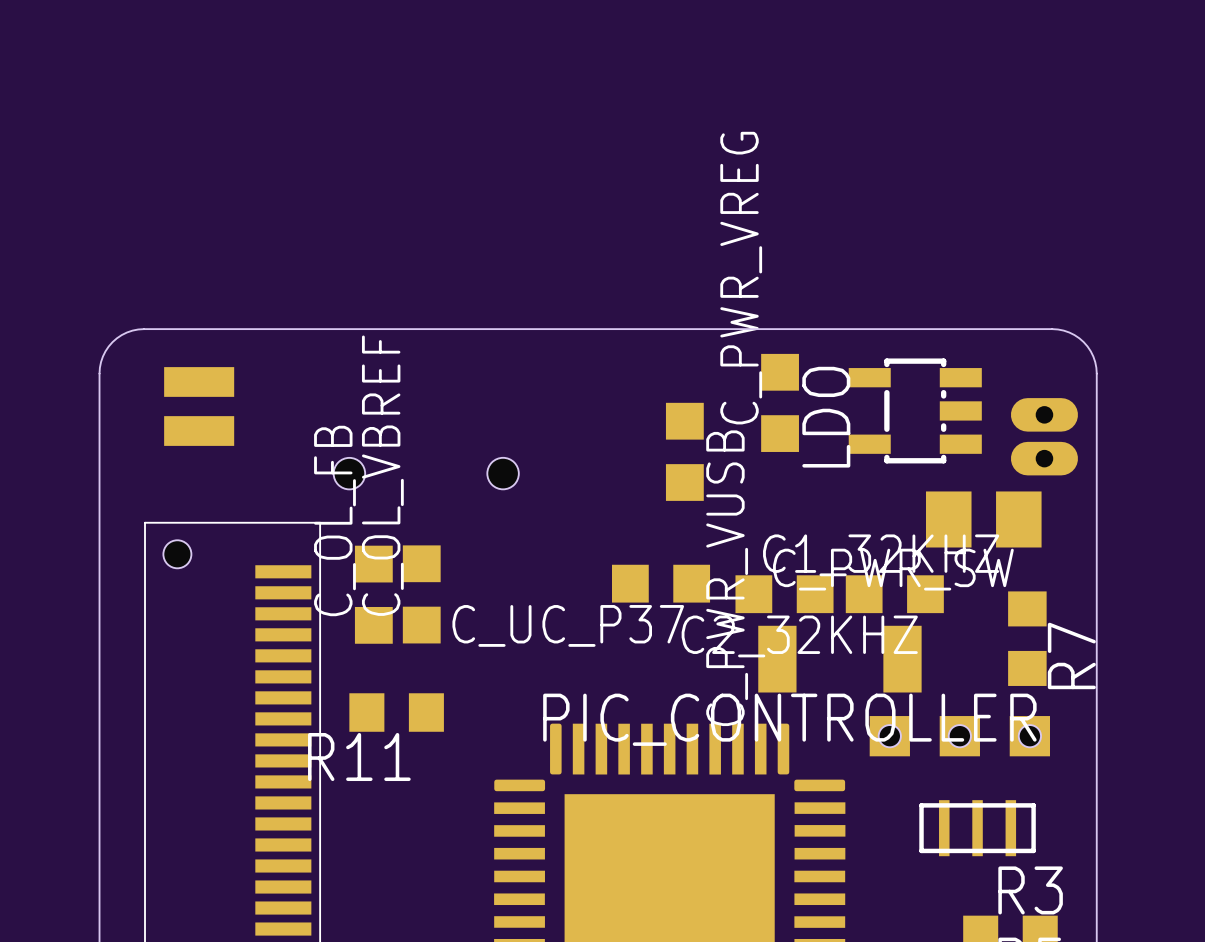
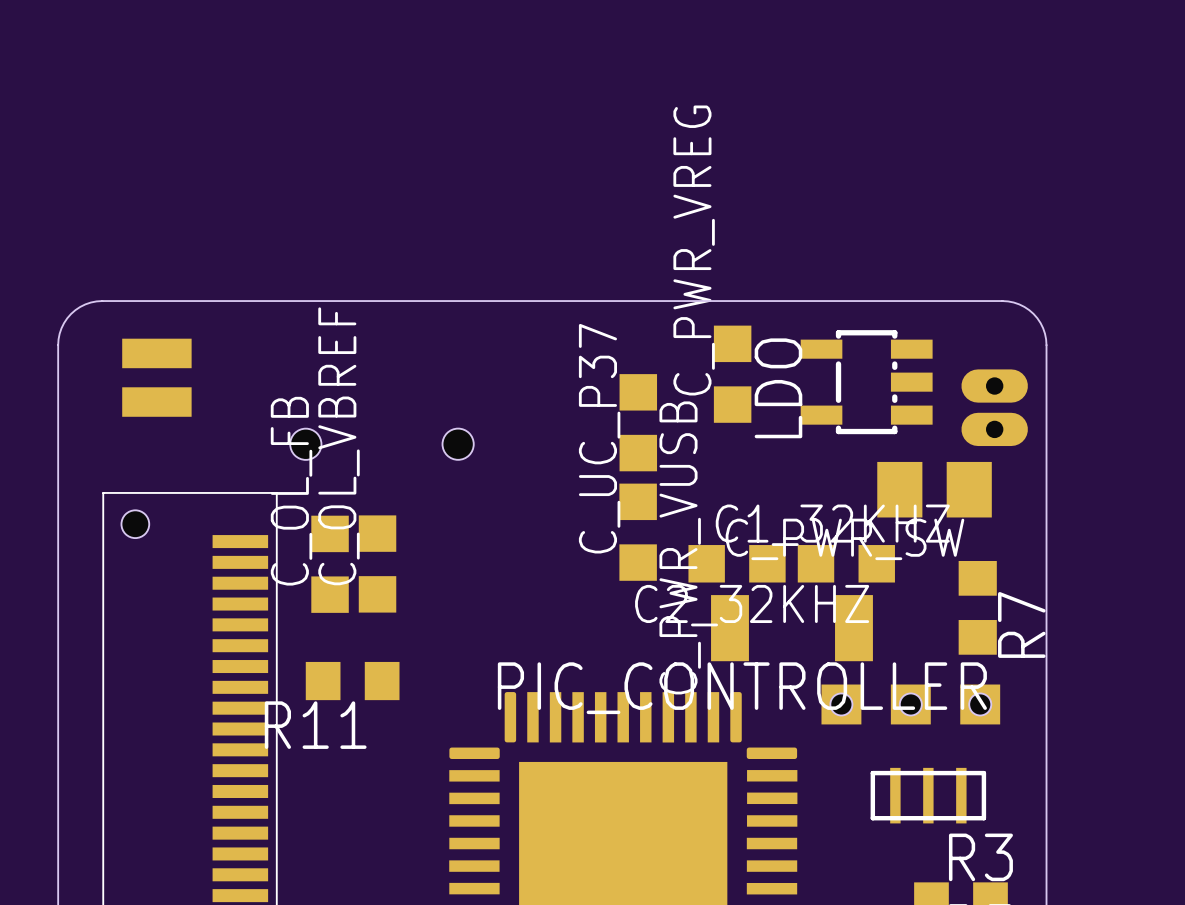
C_UC_P37 rotation: 0° (661, 583) -> 90° clockwise (638, 532)

